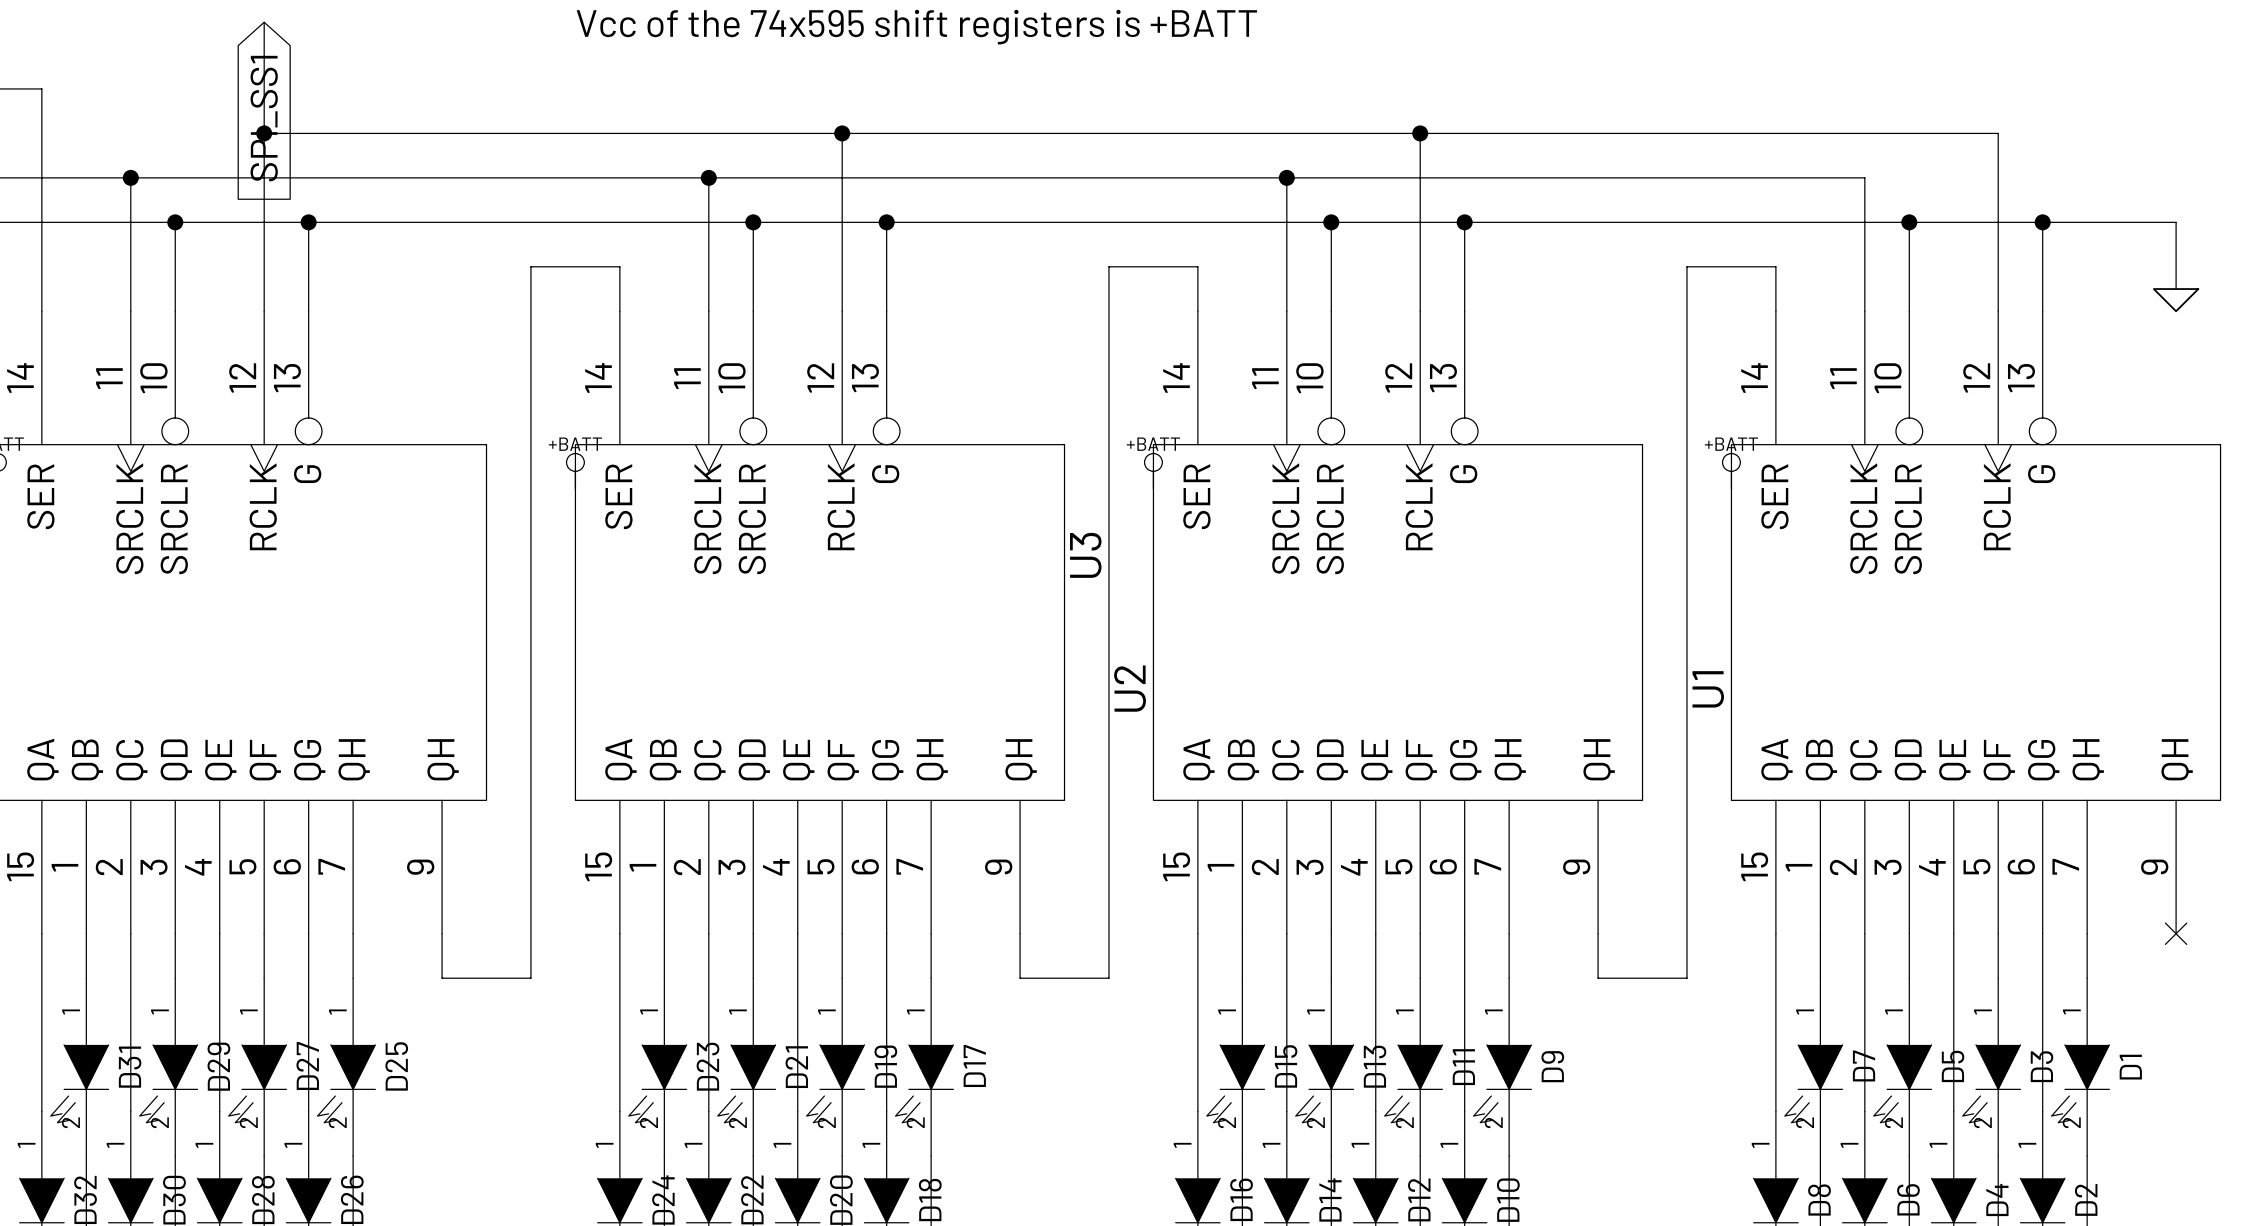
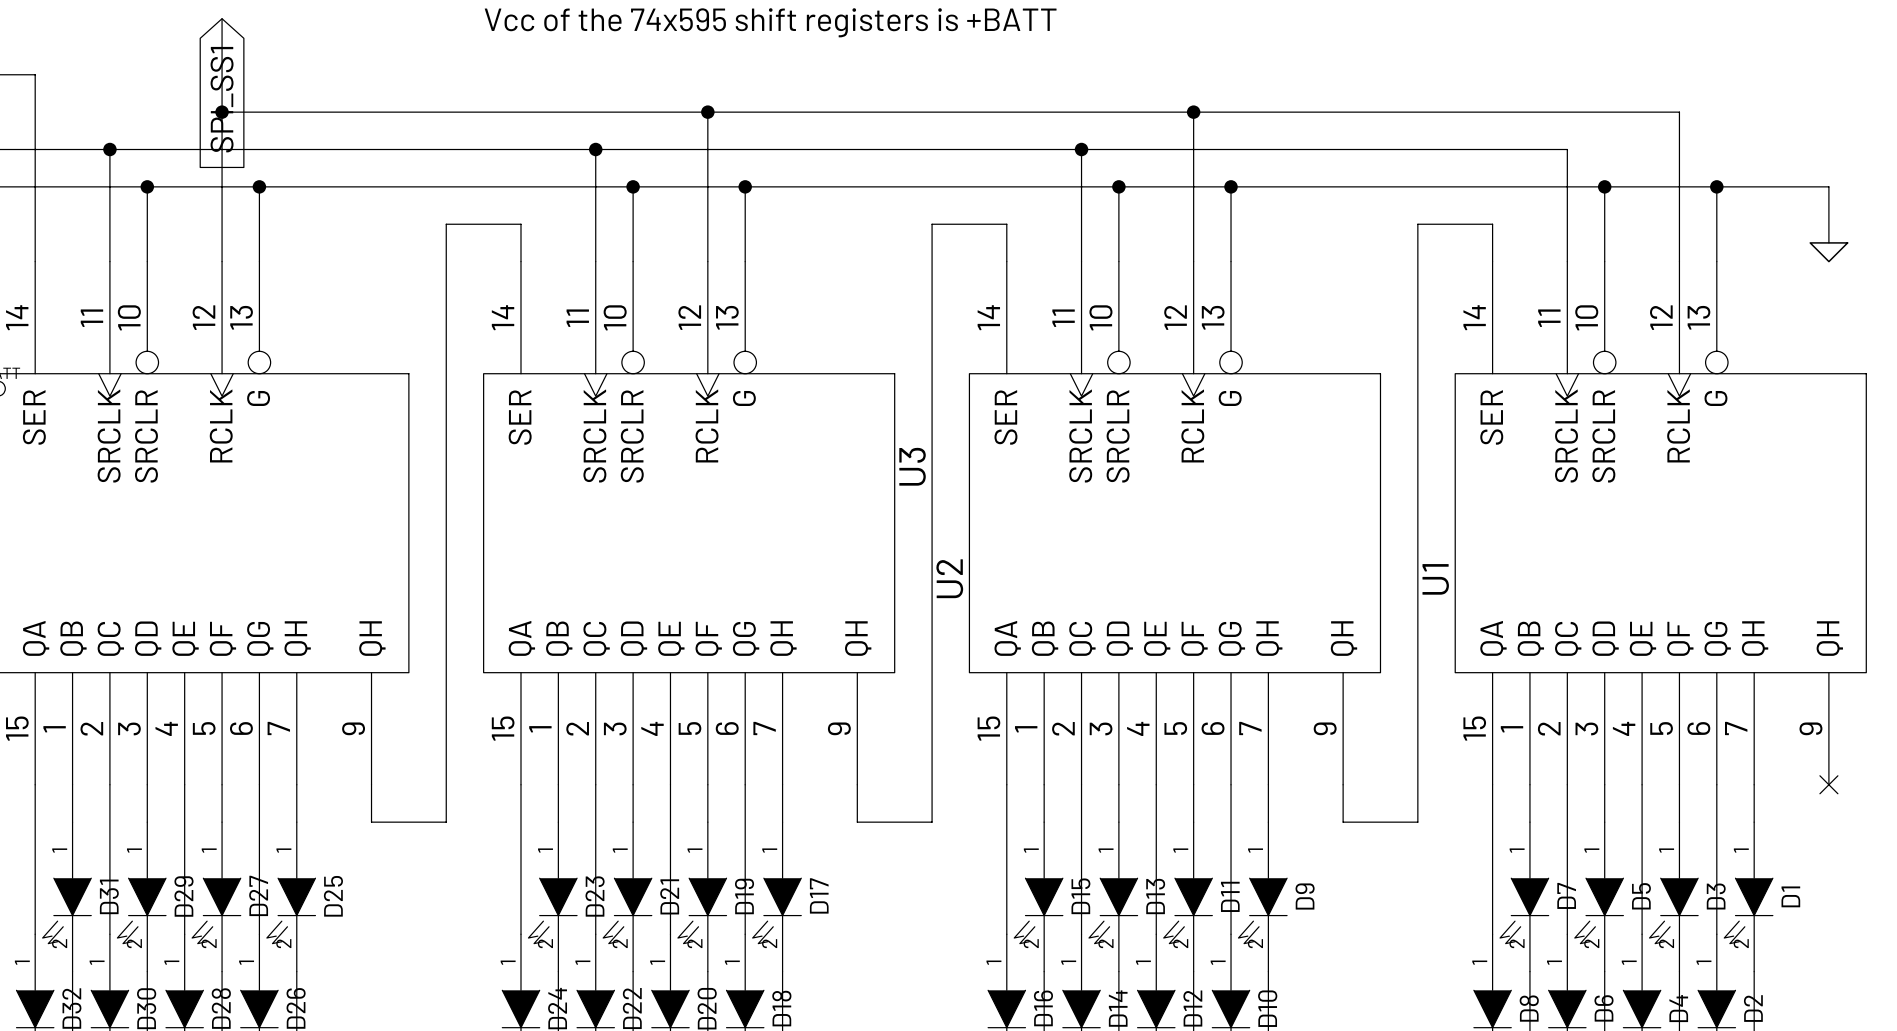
power symbol: +BATT (575, 471) -> none
power symbol: +BATT (1153, 471) -> none
power symbol: +BATT (1731, 471) -> none

